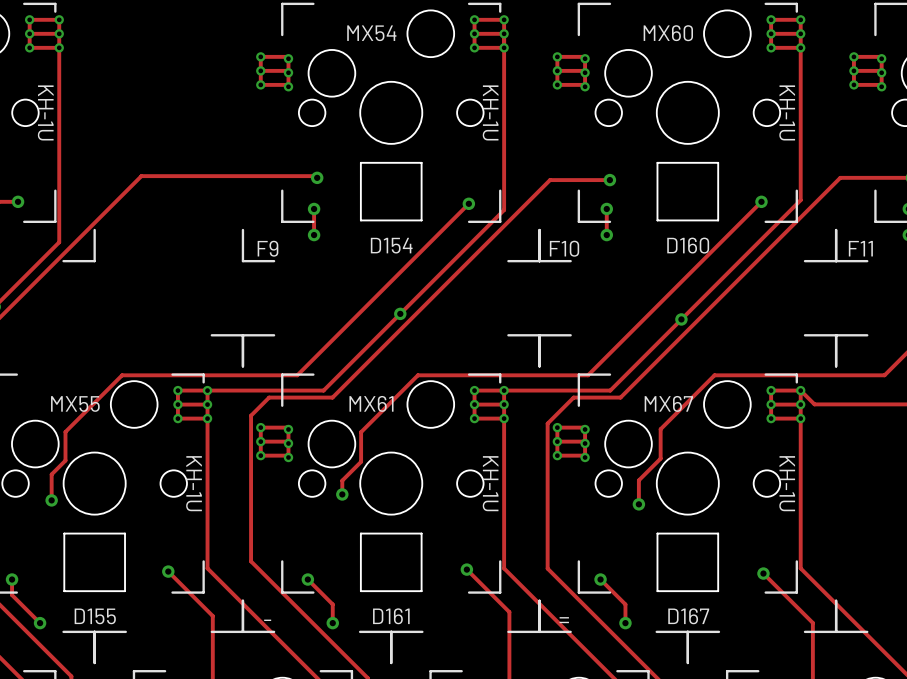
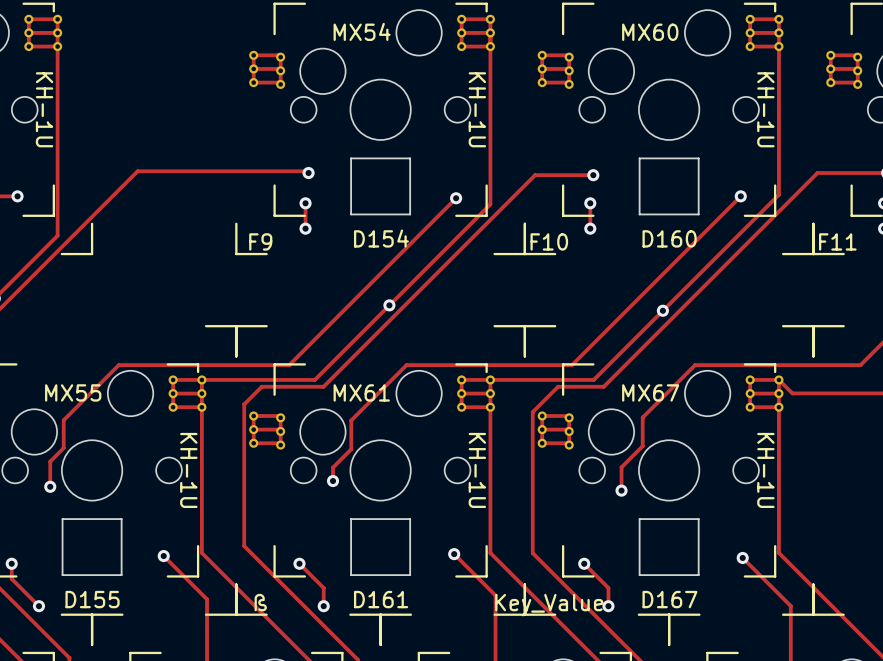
part text: - (267, 620) -> ß (260, 602)
part text: = (564, 620) -> Key_Value (549, 605)

